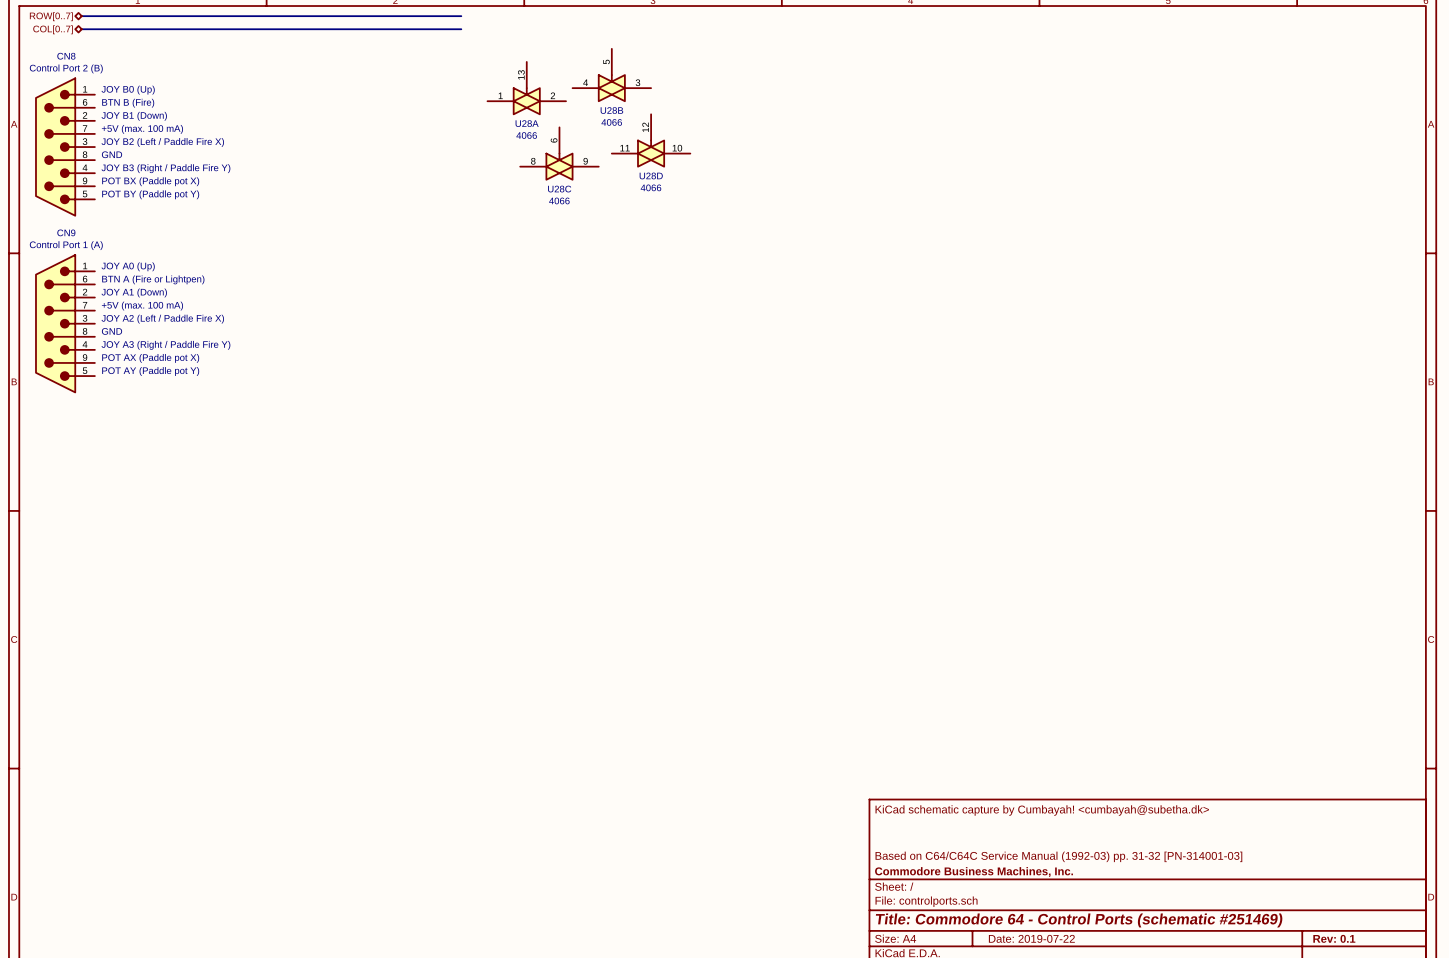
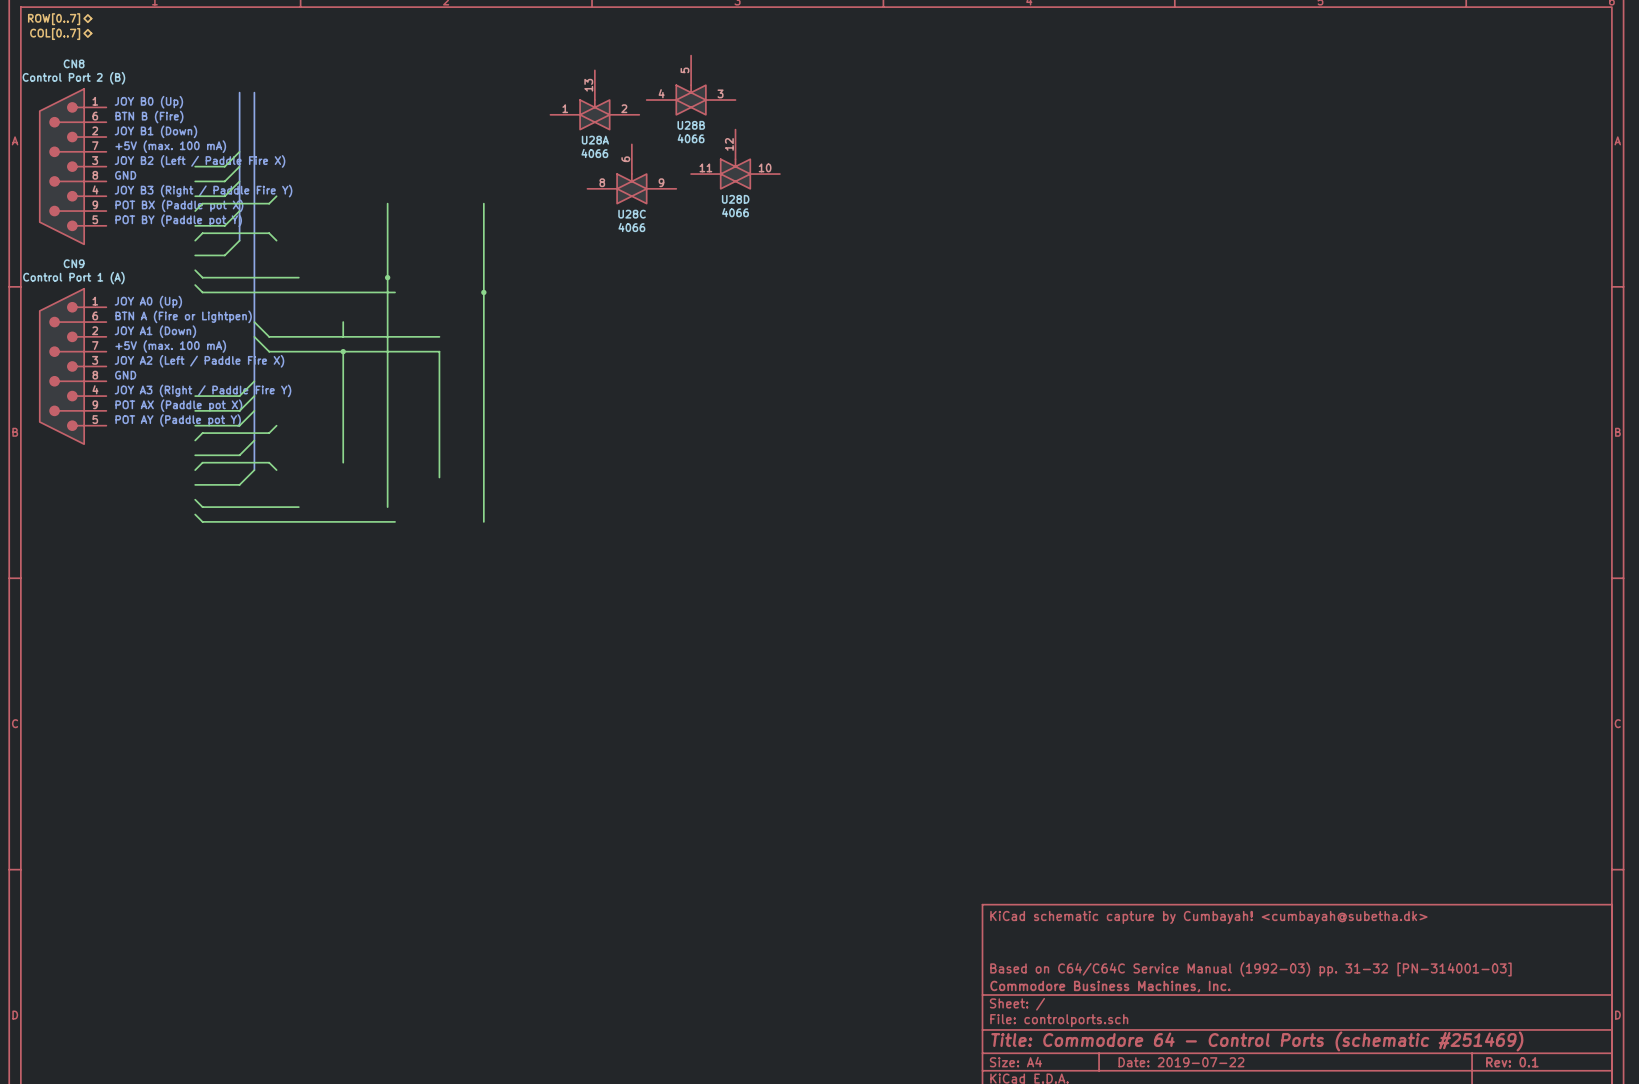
bus: (81, 16) (461, 16) -> none
bus: (81, 29) (461, 29) -> none
bus: none -> (239, 92) (239, 240)
bus: none -> (254, 92) (254, 470)
wire: none -> (239, 151) (224, 166) (195, 166)
wire: none -> (239, 166) (224, 181) (195, 181)
wire: none -> (239, 181) (224, 196) (195, 196)
wire: none -> (276, 196) (269, 203) (202, 203) (195, 211)
wire: none -> (387, 203) (387, 507)
wire: none -> (483, 203) (483, 521)
wire: none -> (239, 211) (224, 225) (195, 225)
wire: none -> (195, 240) (202, 233) (269, 233) (276, 240)
wire: none -> (239, 240) (224, 255) (195, 255)
wire: none -> (195, 270) (202, 277) (298, 277)
junction: none -> (387, 277)
wire: none -> (195, 285) (202, 292) (395, 292)
junction: none -> (483, 292)
wire: none -> (254, 322) (269, 336) (439, 336)
wire: none -> (343, 322) (343, 336)
wire: none -> (254, 336) (269, 351) (439, 351) (439, 477)
wire: none -> (343, 351) (343, 462)
junction: none -> (343, 351)
wire: none -> (254, 381) (239, 396) (195, 396)
wire: none -> (254, 396) (239, 410) (195, 410)
wire: none -> (254, 410) (239, 425) (195, 425)
wire: none -> (276, 425) (269, 433) (202, 433) (195, 440)
wire: none -> (254, 440) (239, 455) (195, 455)
wire: none -> (195, 470) (202, 462) (269, 462) (276, 470)
wire: none -> (254, 470) (239, 484) (195, 484)
wire: none -> (195, 499) (202, 507) (298, 507)
wire: none -> (195, 514) (202, 521) (395, 521)

